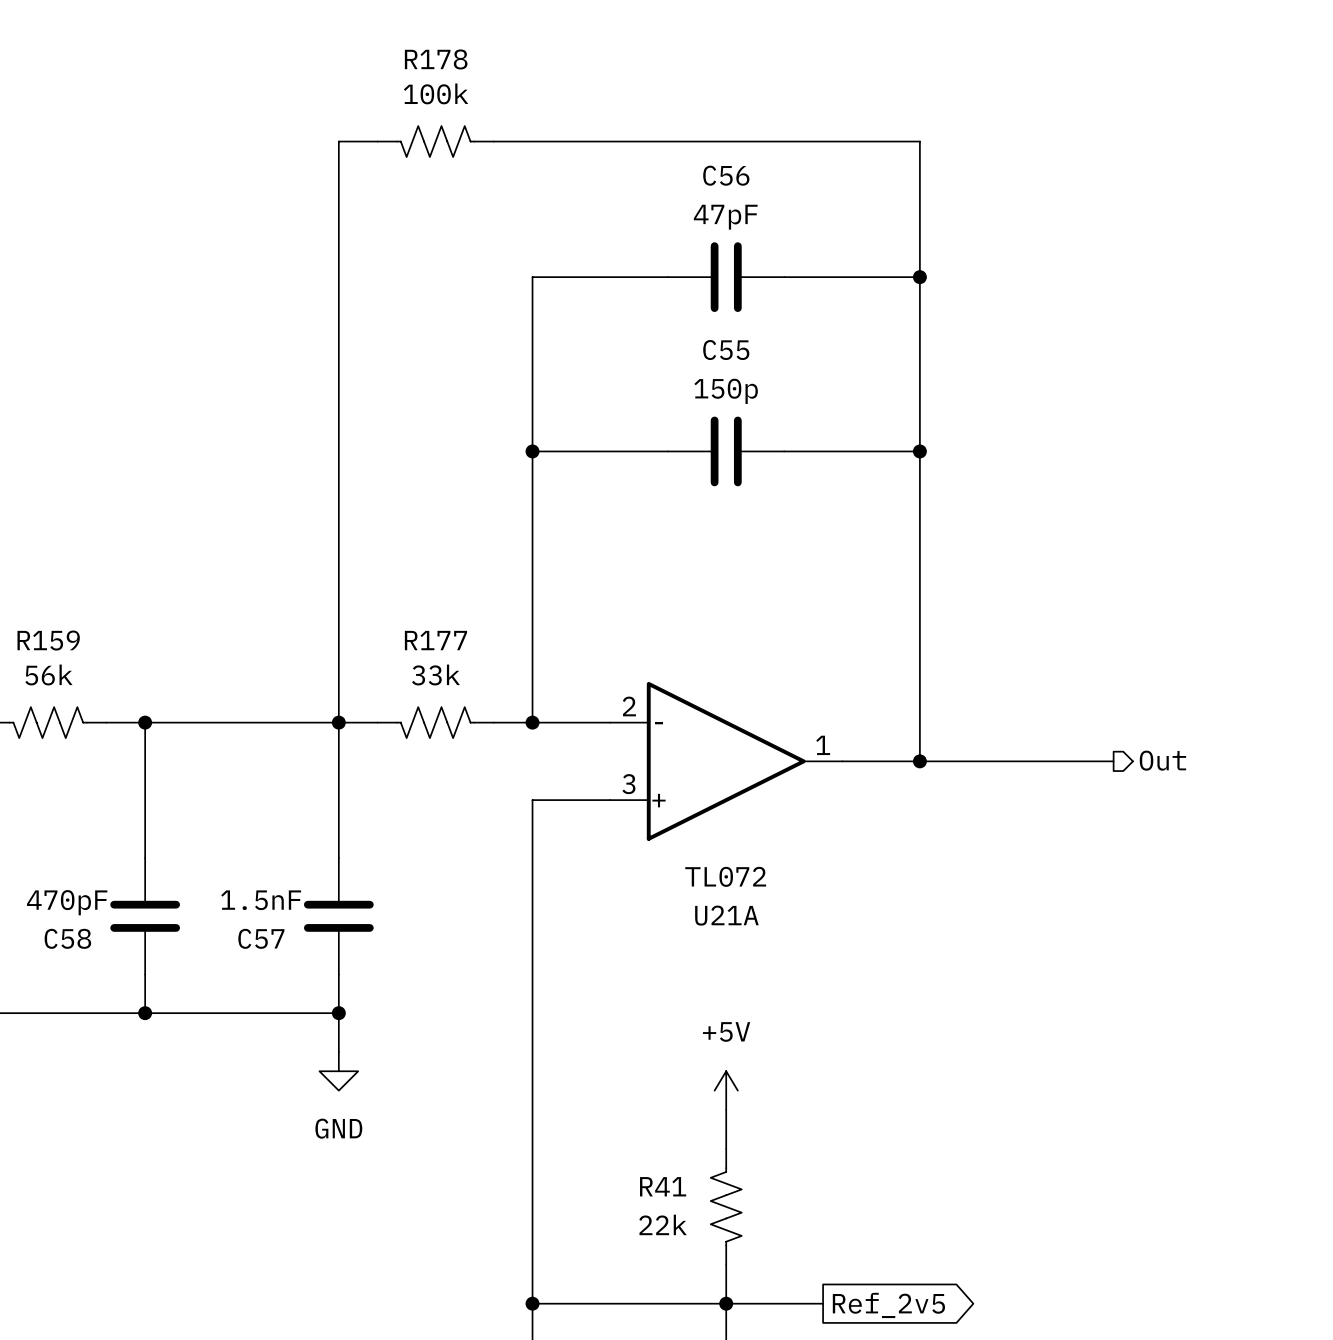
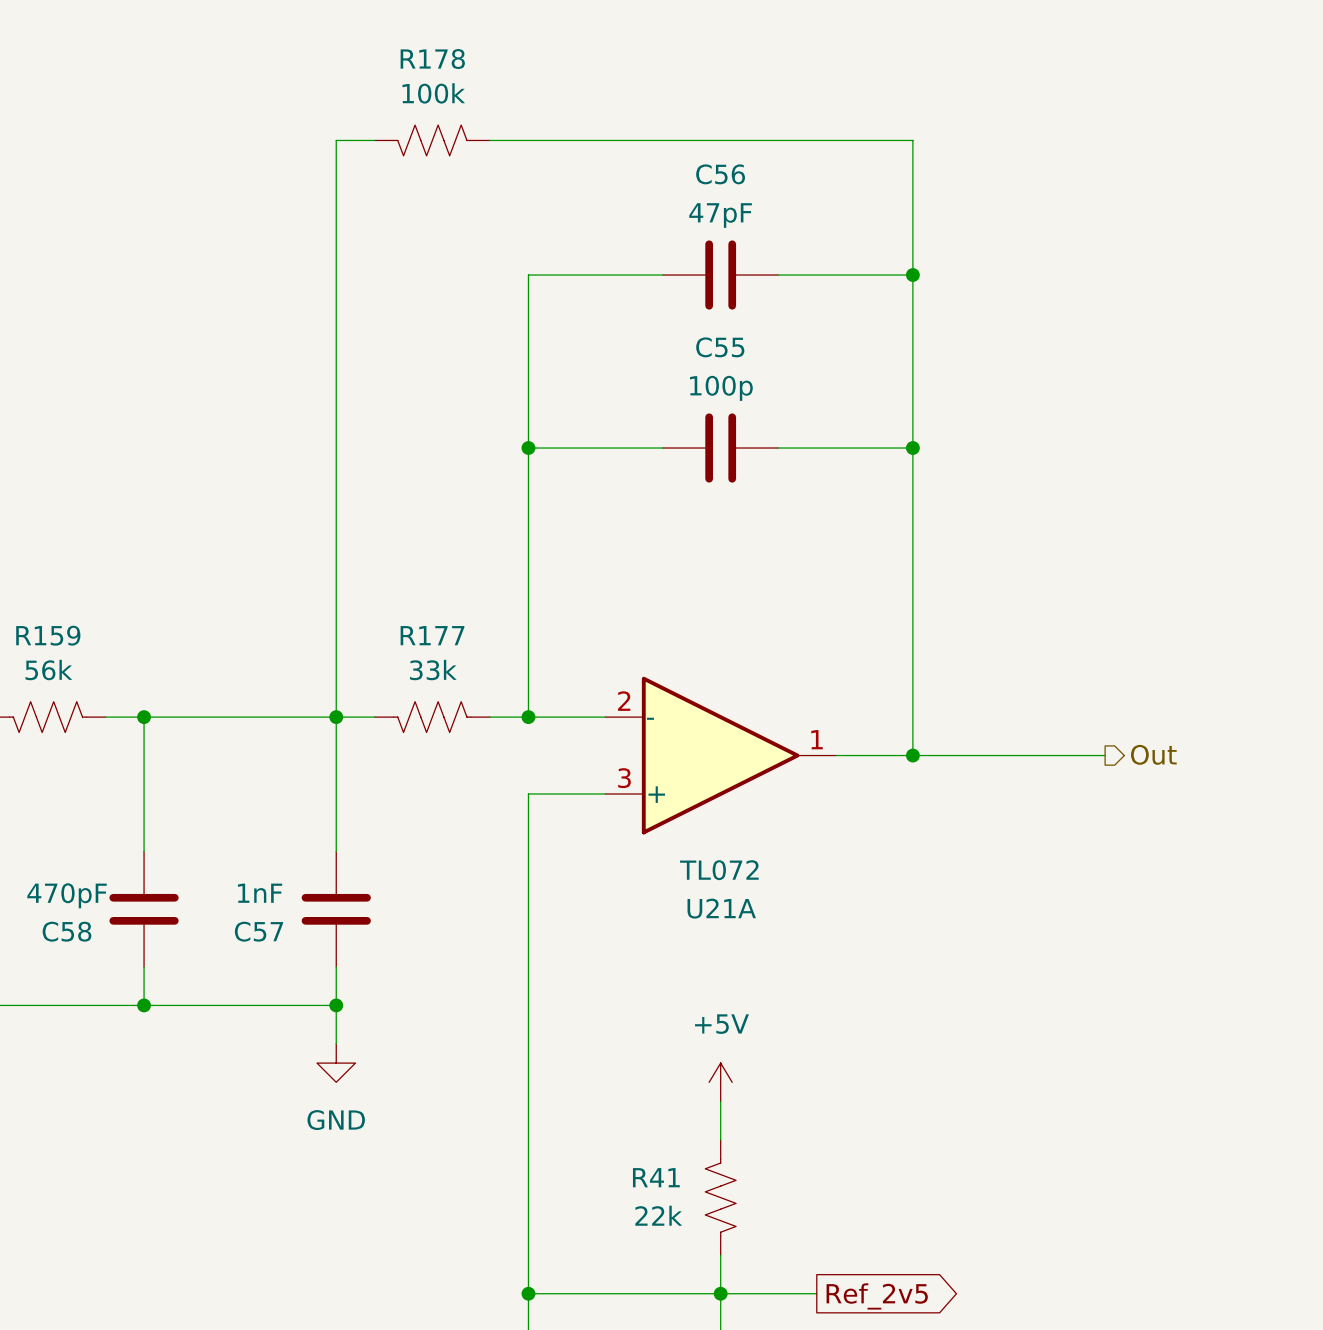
C55 value: 150p (726, 391) -> 100p (721, 388)
C57 value: 1.5nF (261, 900) -> 1nF (260, 893)

